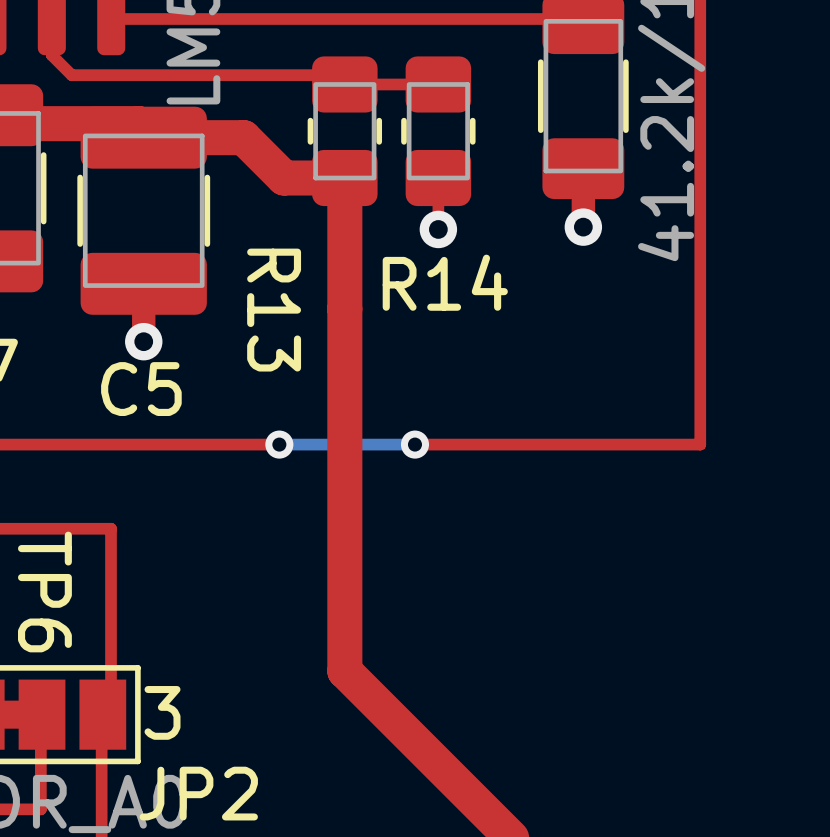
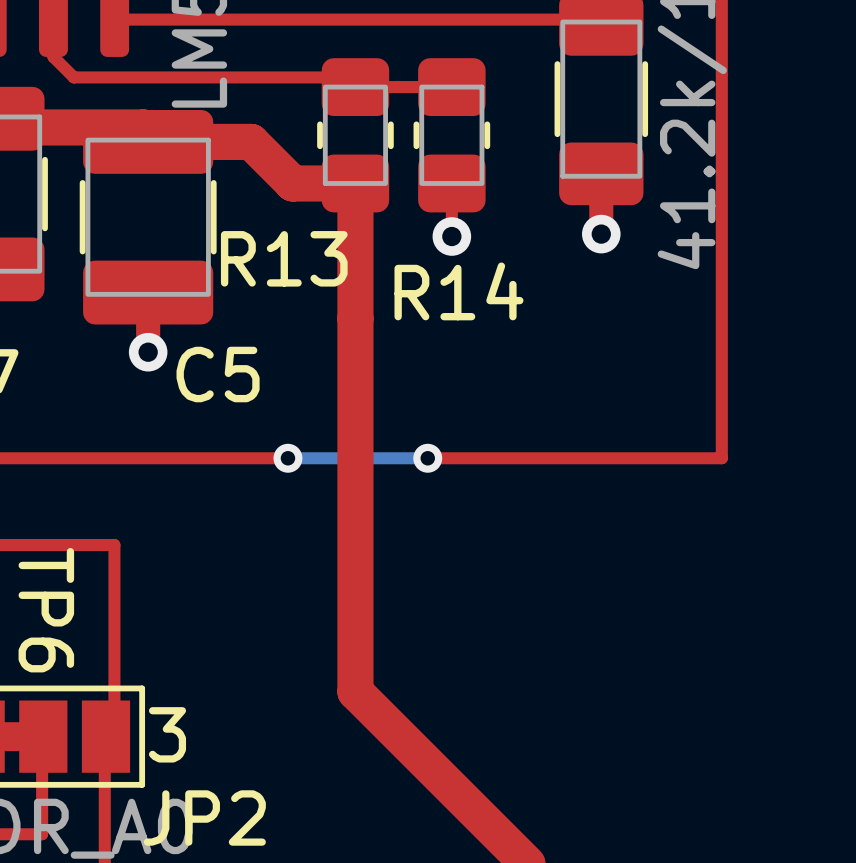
R13 name rotation: 0° (274, 310) -> 90° counterclockwise (284, 258)
C5 name position: C5 (141, 389) -> C5 (218, 374)

